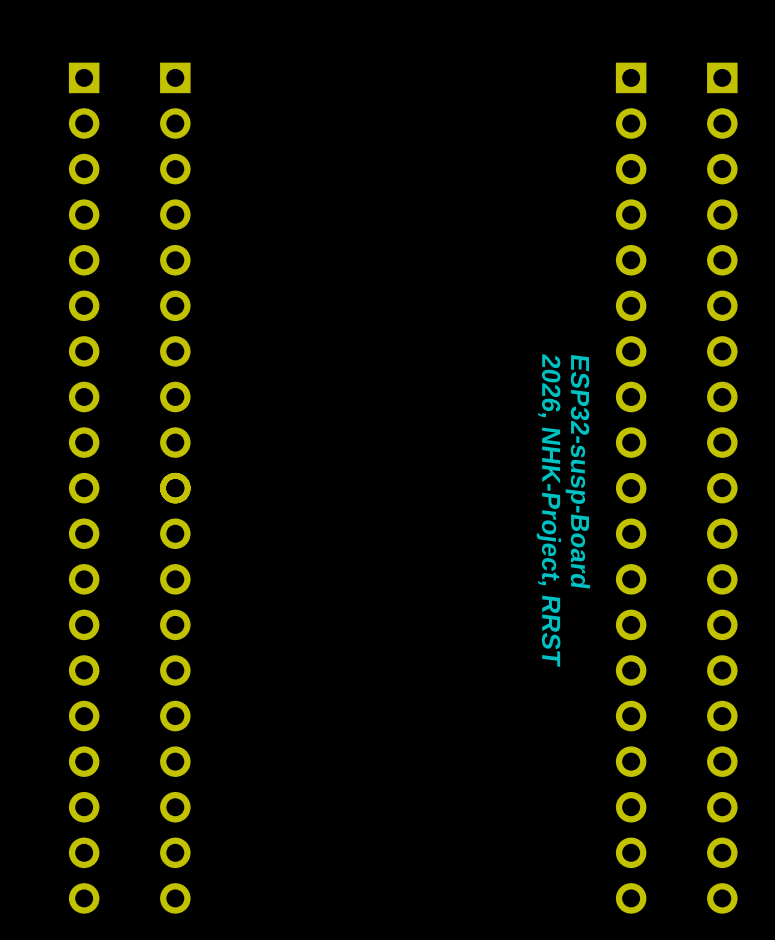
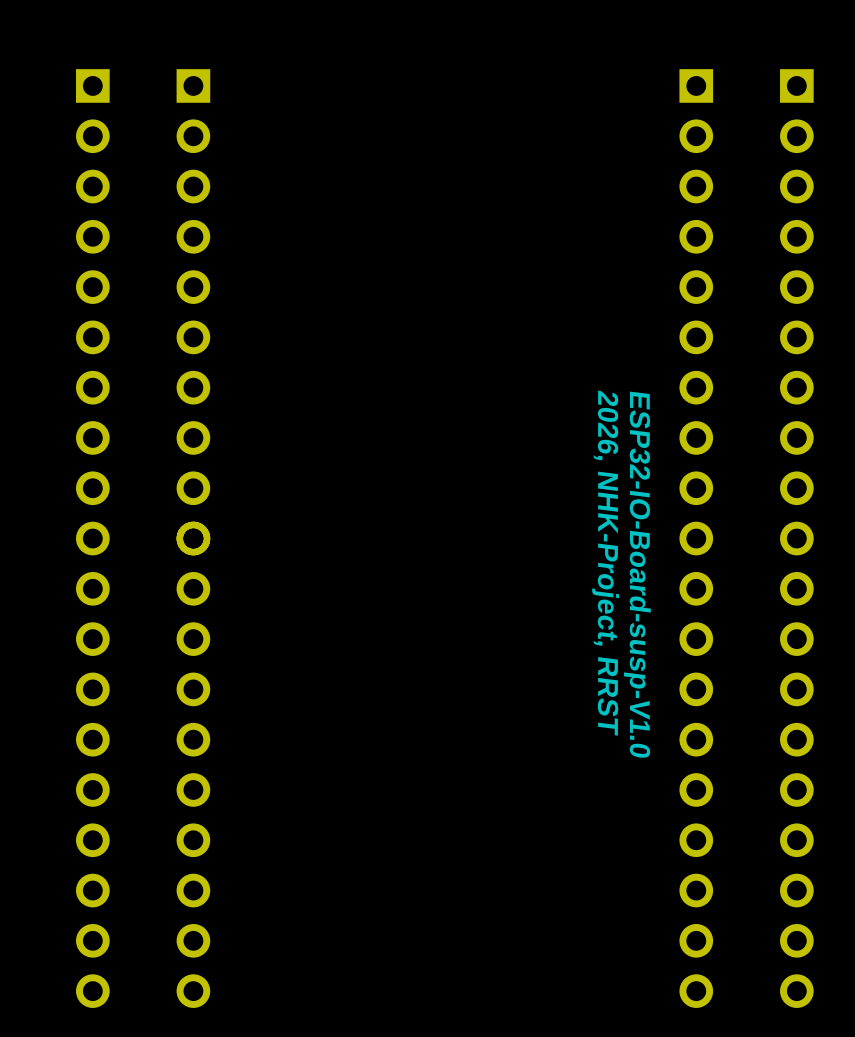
text: ESP32-susp-Board (577, 471) -> ESP32-IO-Board-susp-V1.0 (637, 574)

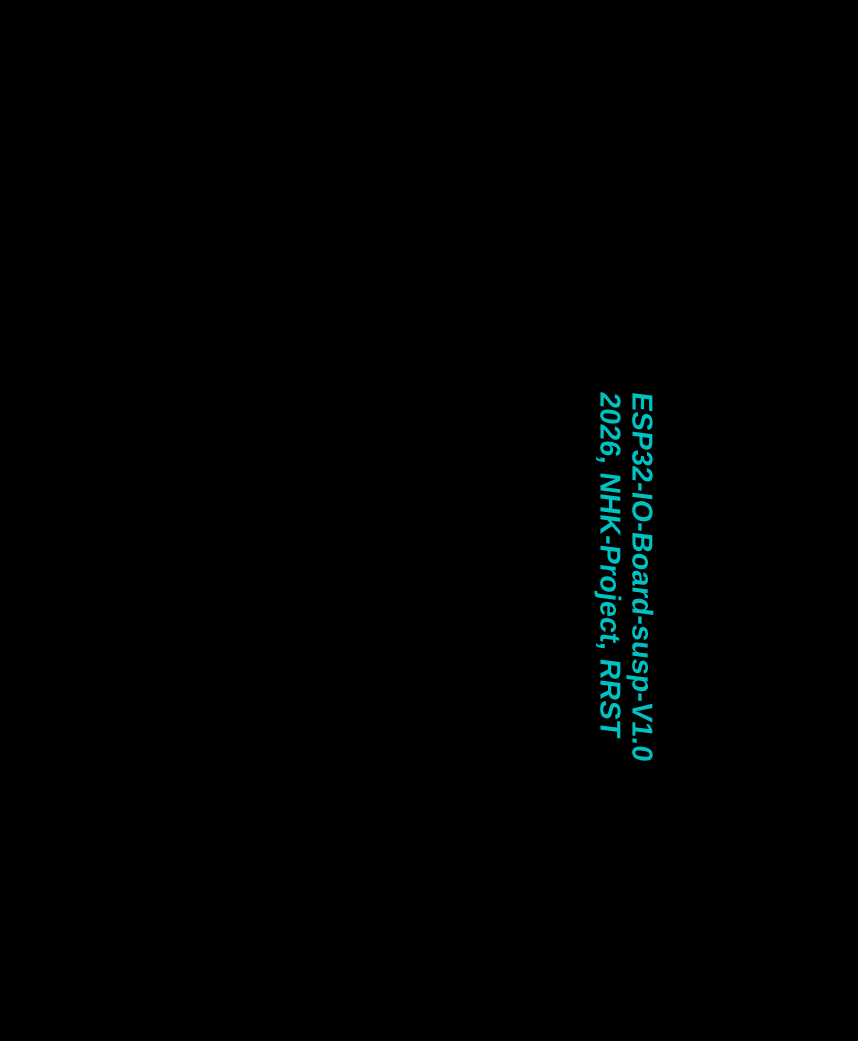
part: (92, 538) -> none
part: (193, 538) -> none
part: (193, 538) -> none
part: (696, 538) -> none
part: (796, 538) -> none

